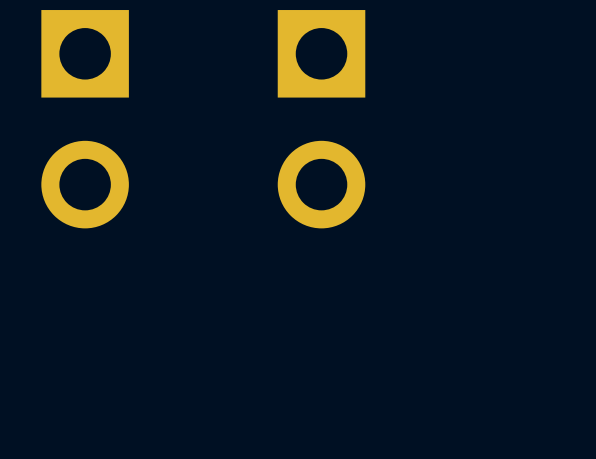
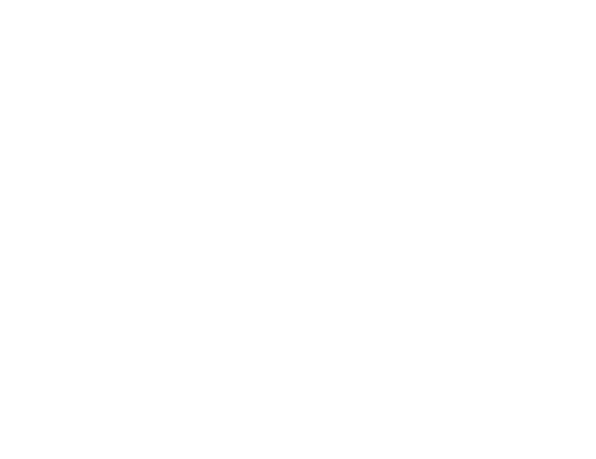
part: (85, 119) -> none
part: (321, 119) -> none

